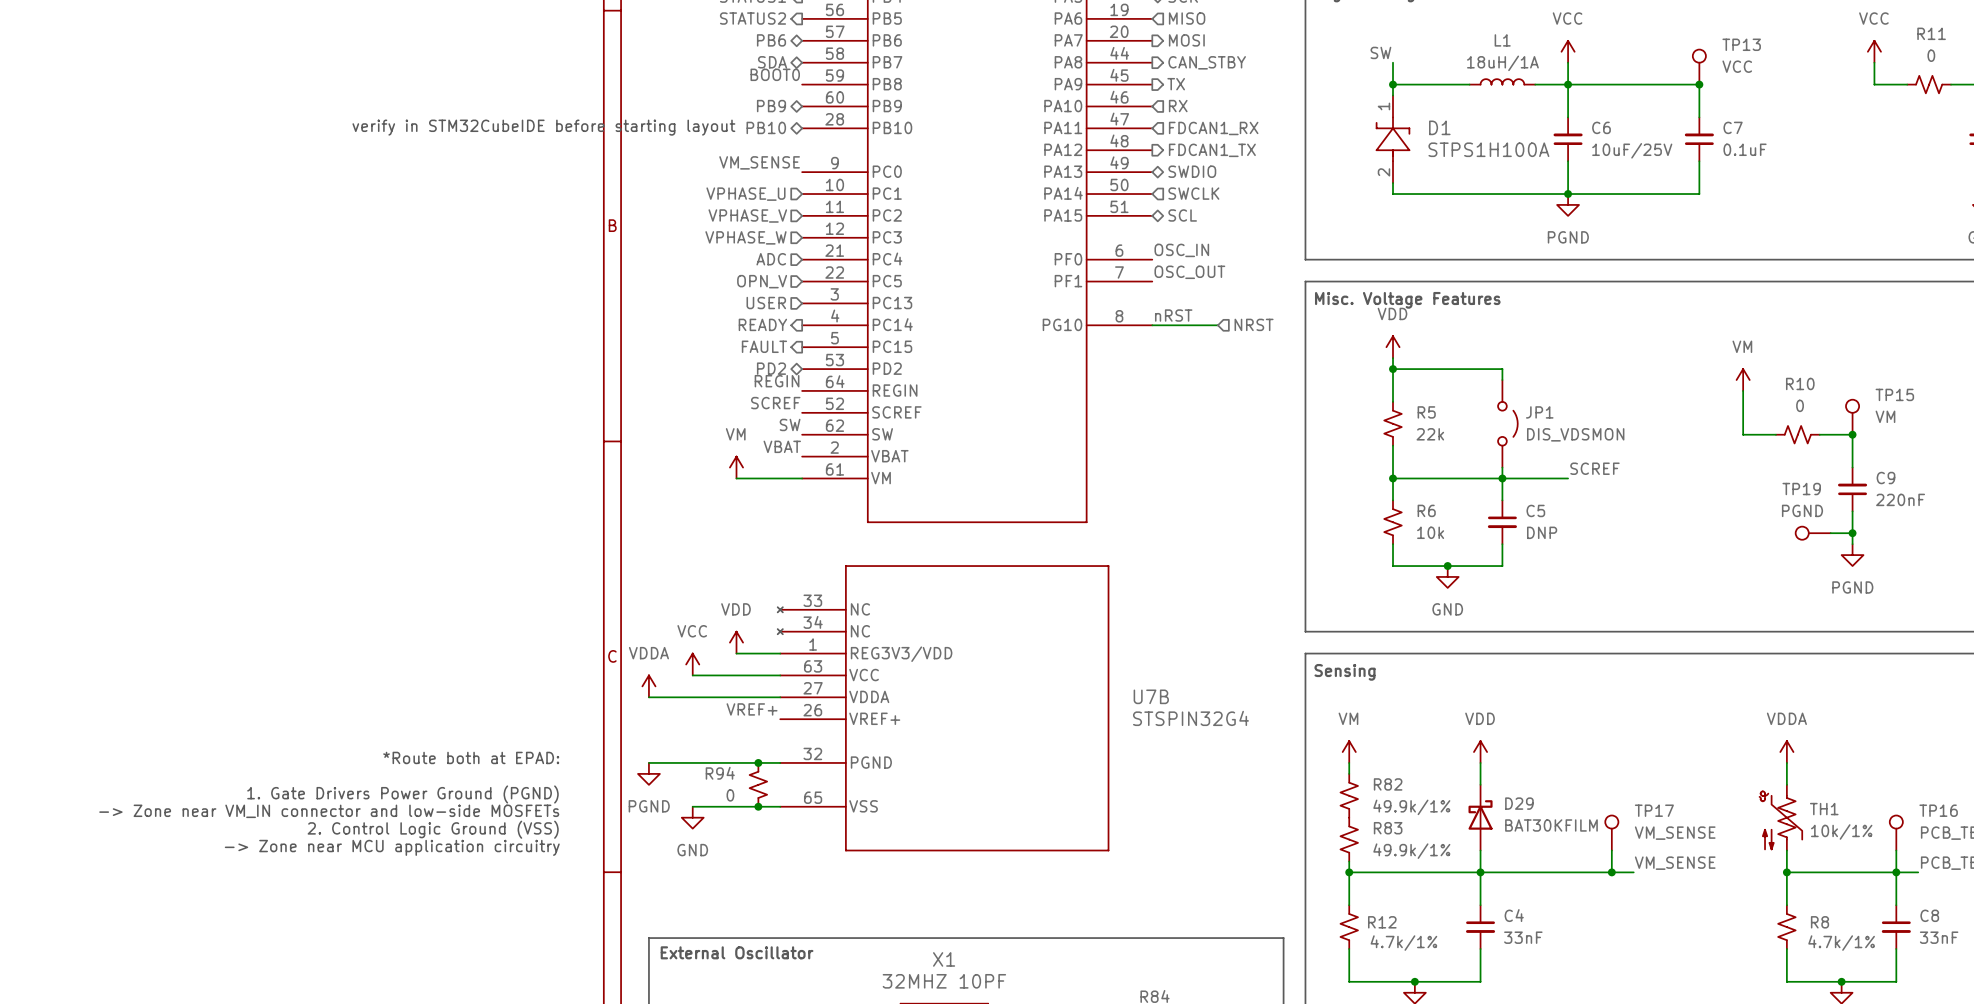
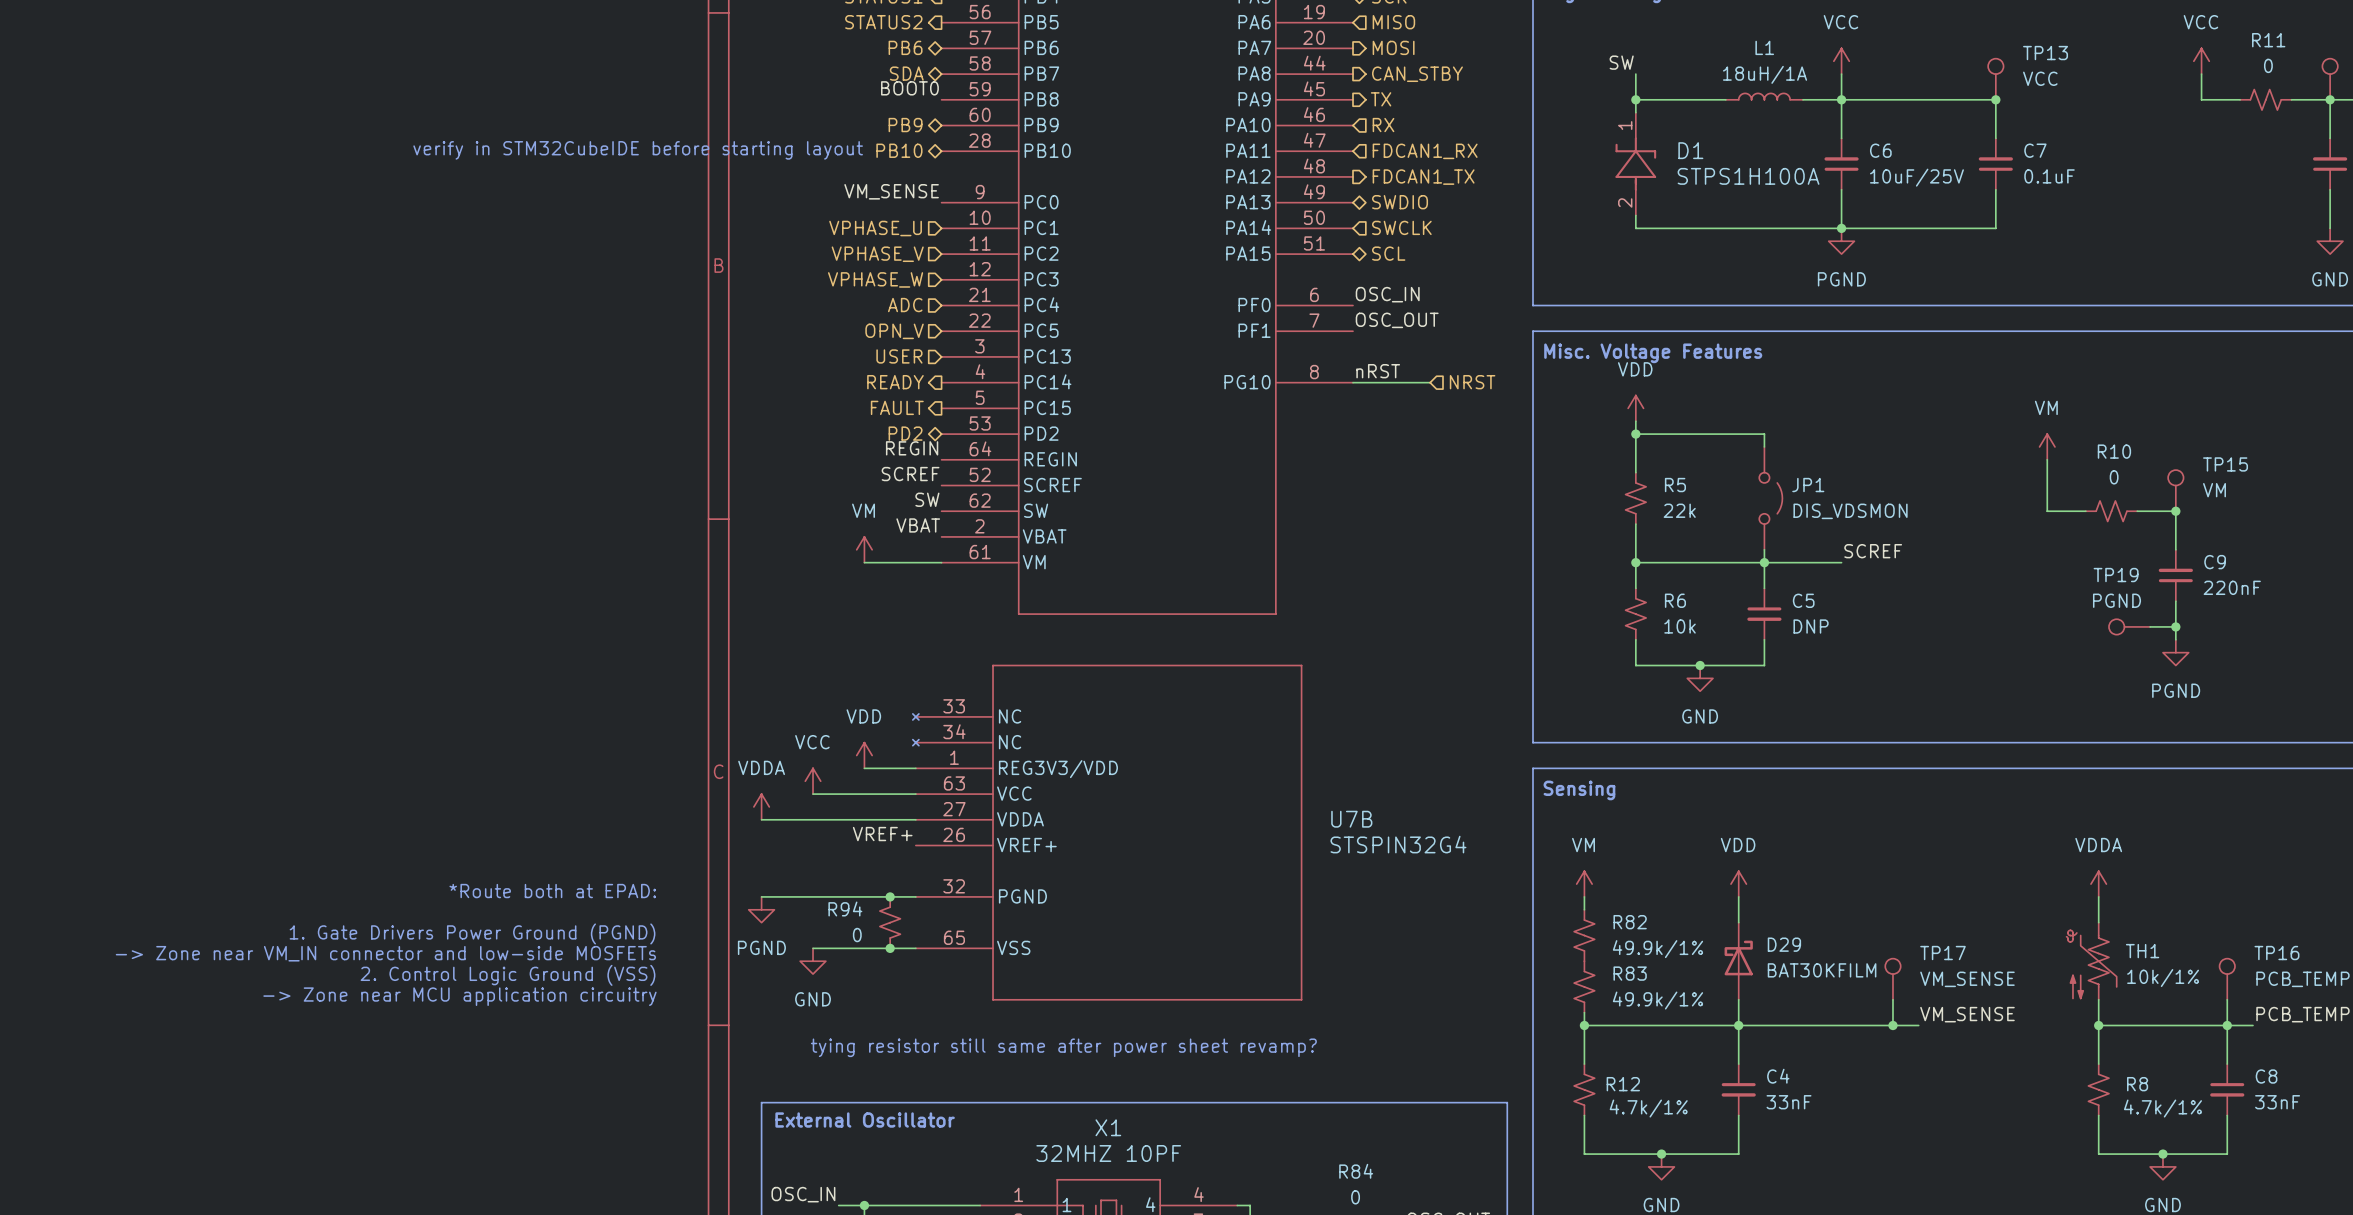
text: none -> tying resistor still same after power sheet revamp? (1063, 1047)

